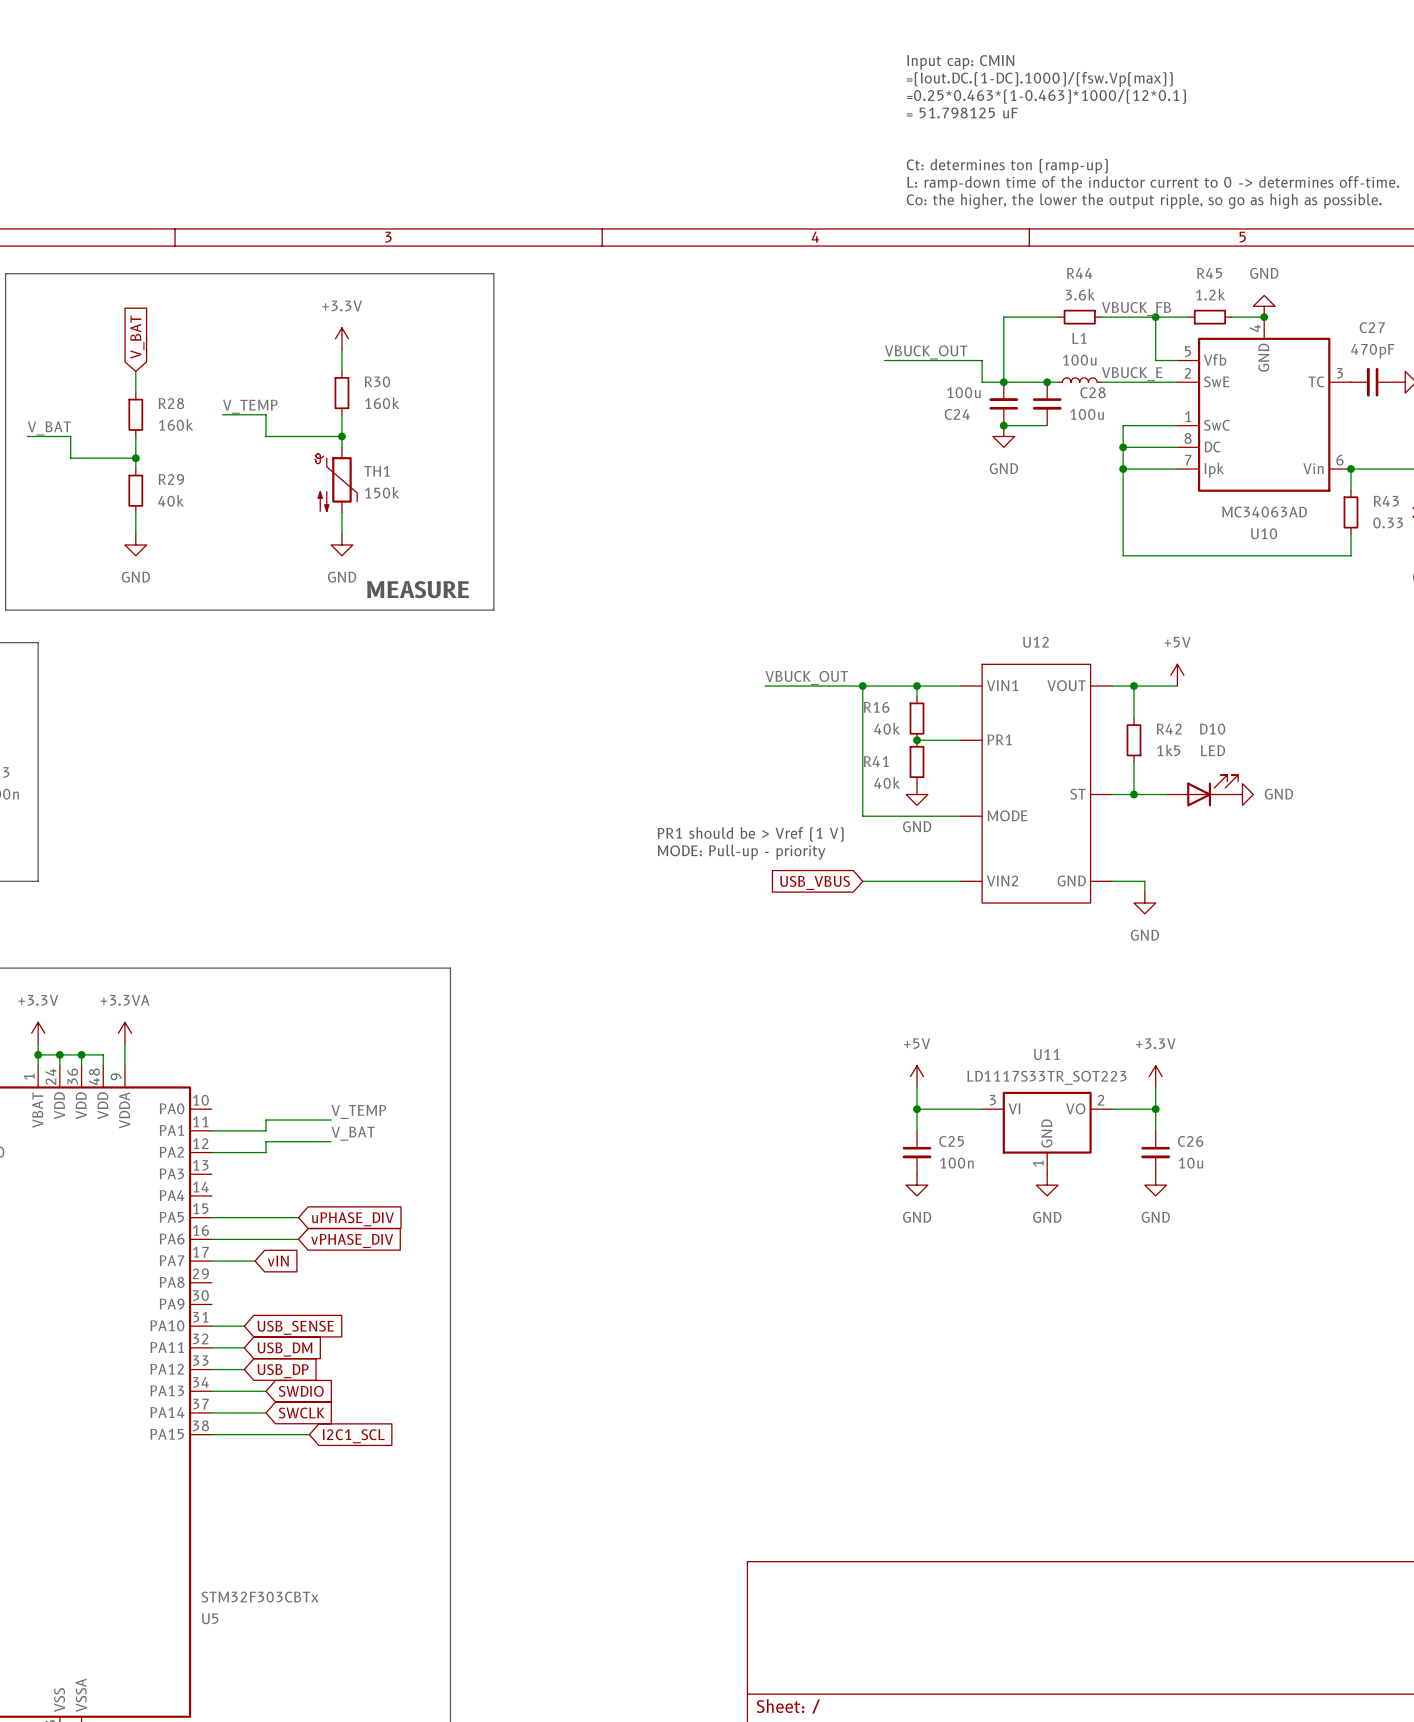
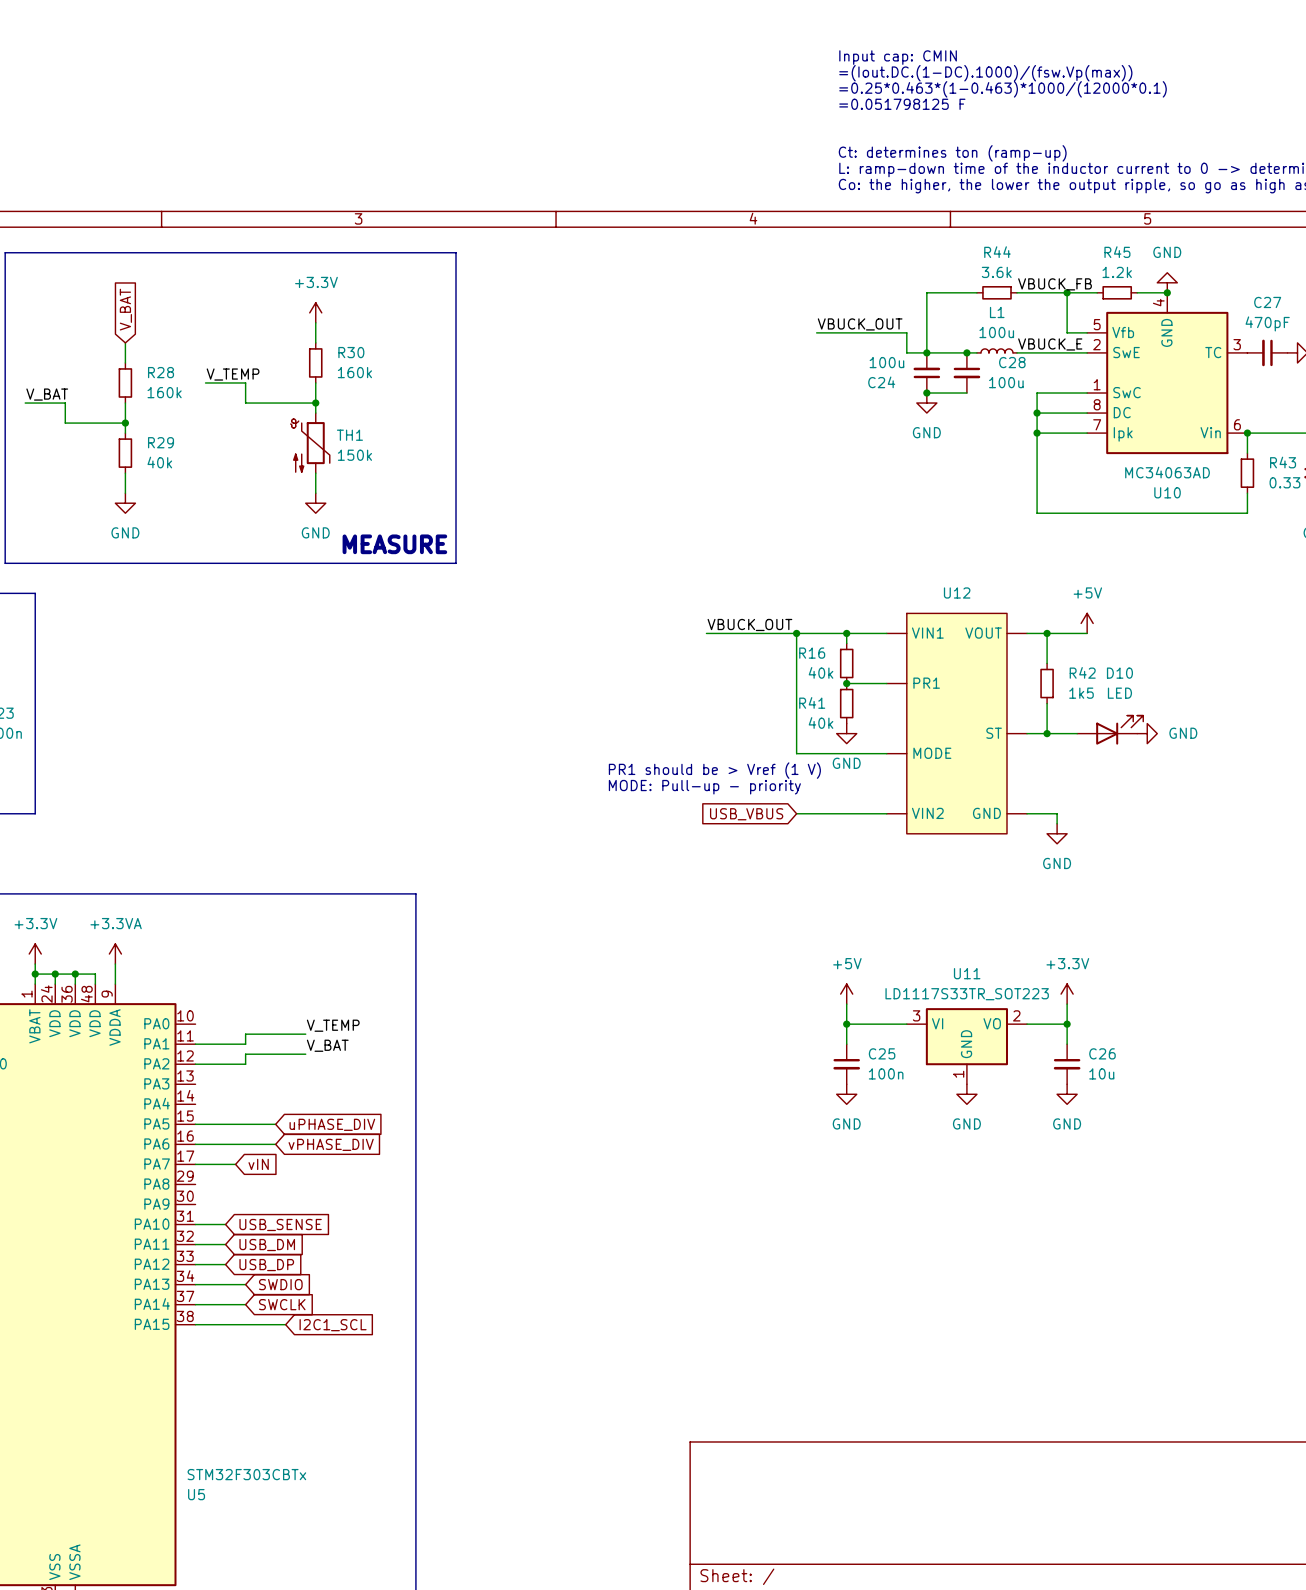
text: =0.25*0.463*(1-0.463)*1000/(12*0.1) (1046, 96) -> =0.25*0.463*(1-0.463)*1000/(12000*0.1) (1003, 89)
text: = 51.798125 uF (962, 113) -> =0.051798125 F (902, 104)

